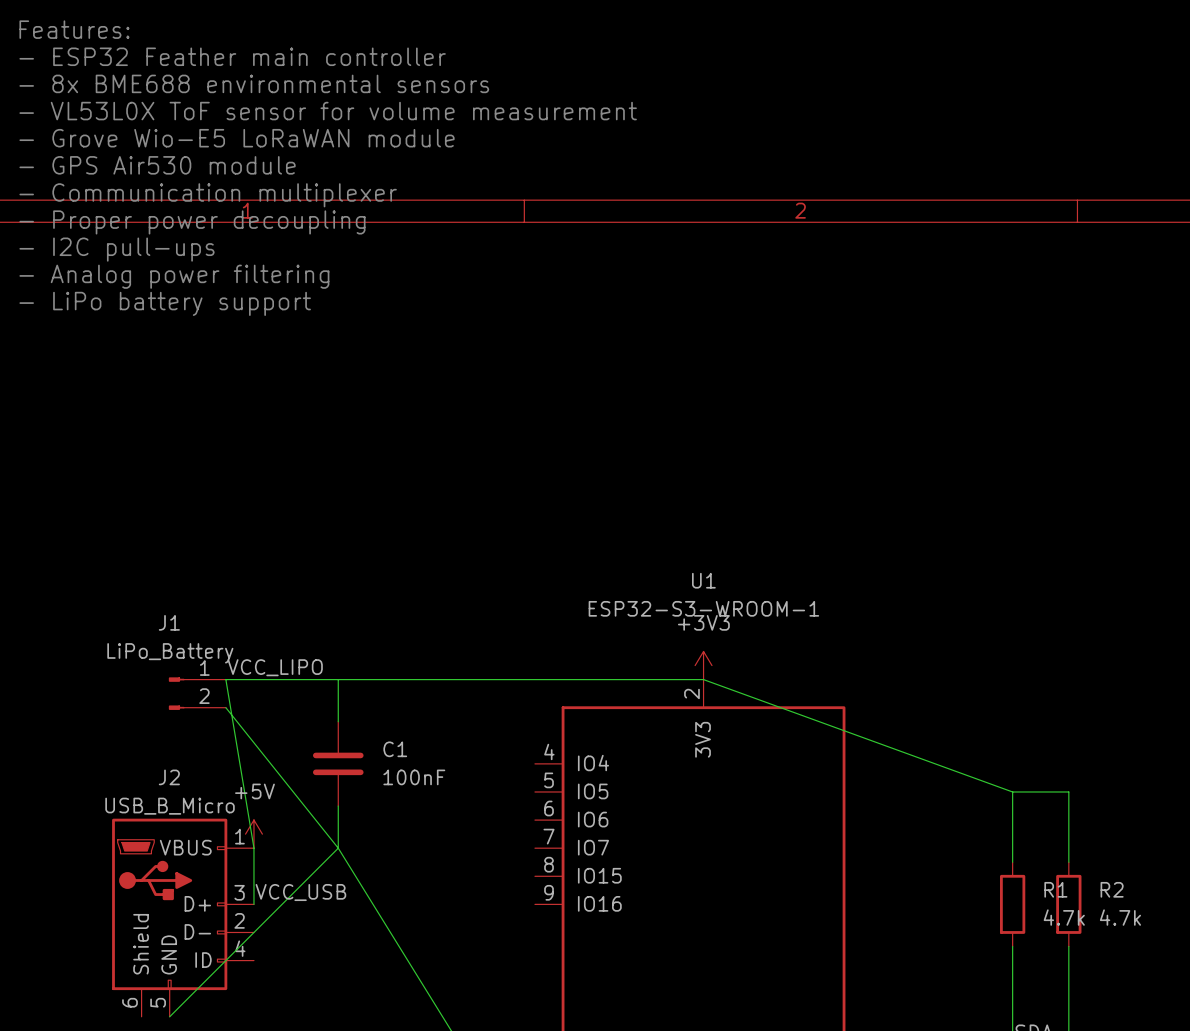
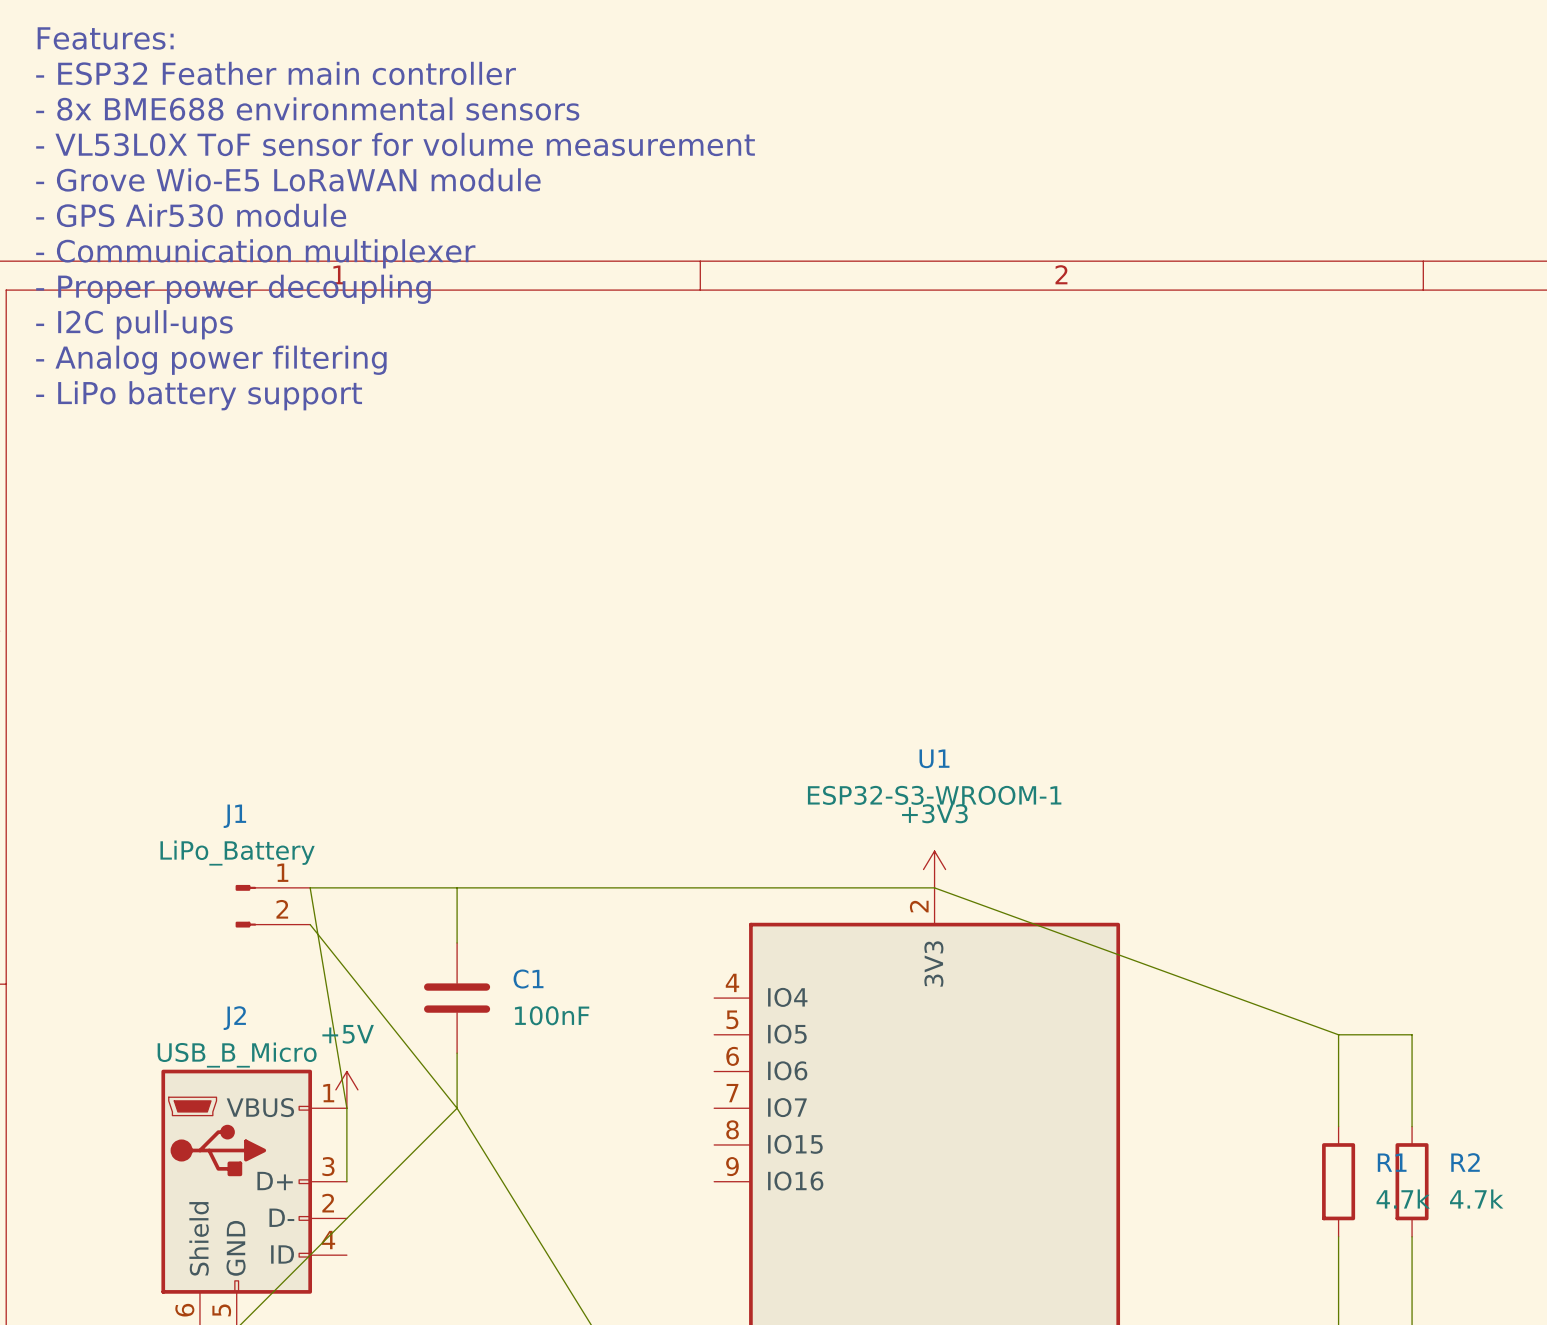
label: VCC_LIPO (275, 667) -> none
label: VCC_USB (300, 892) -> none

